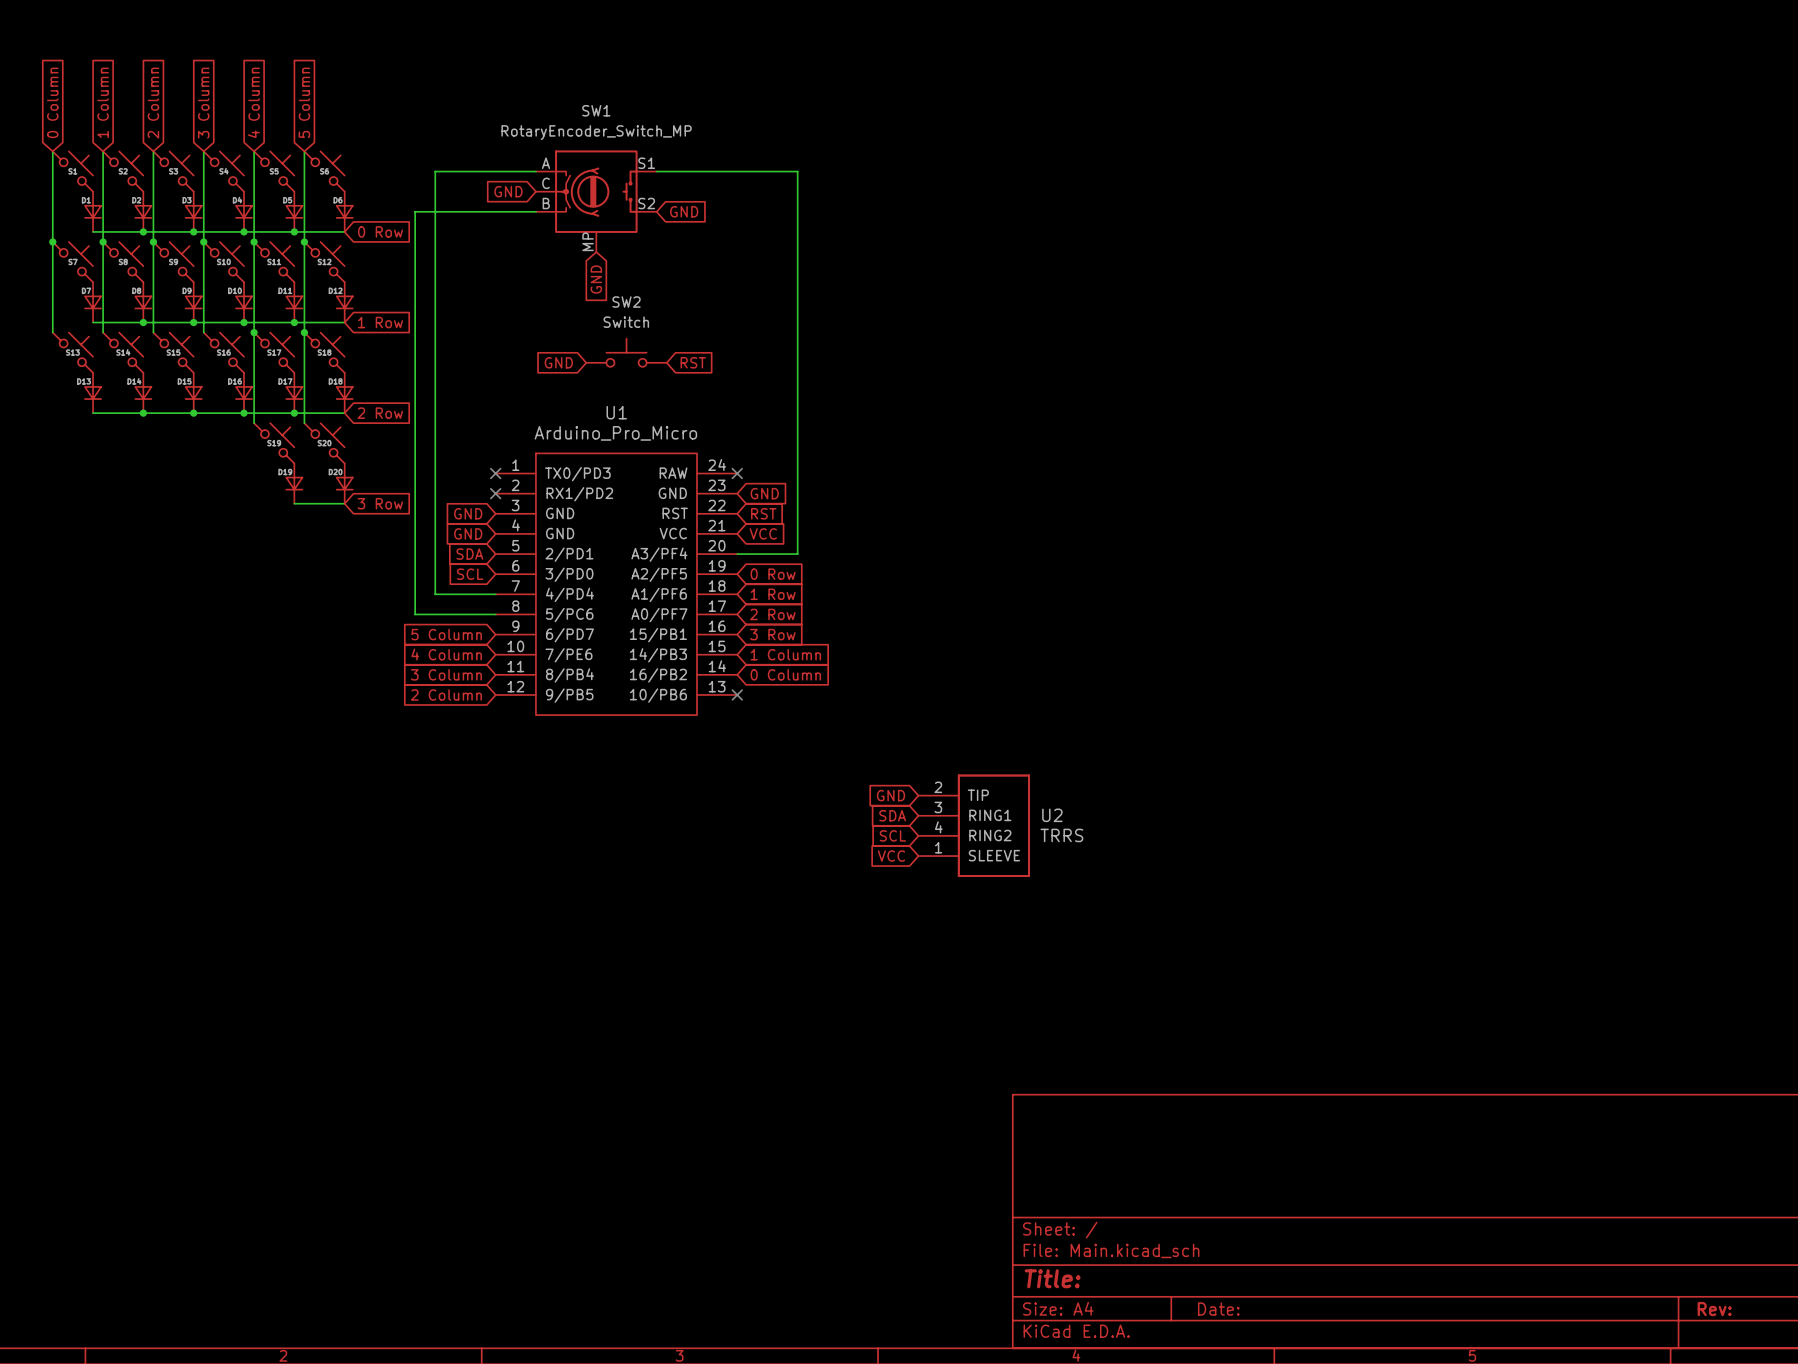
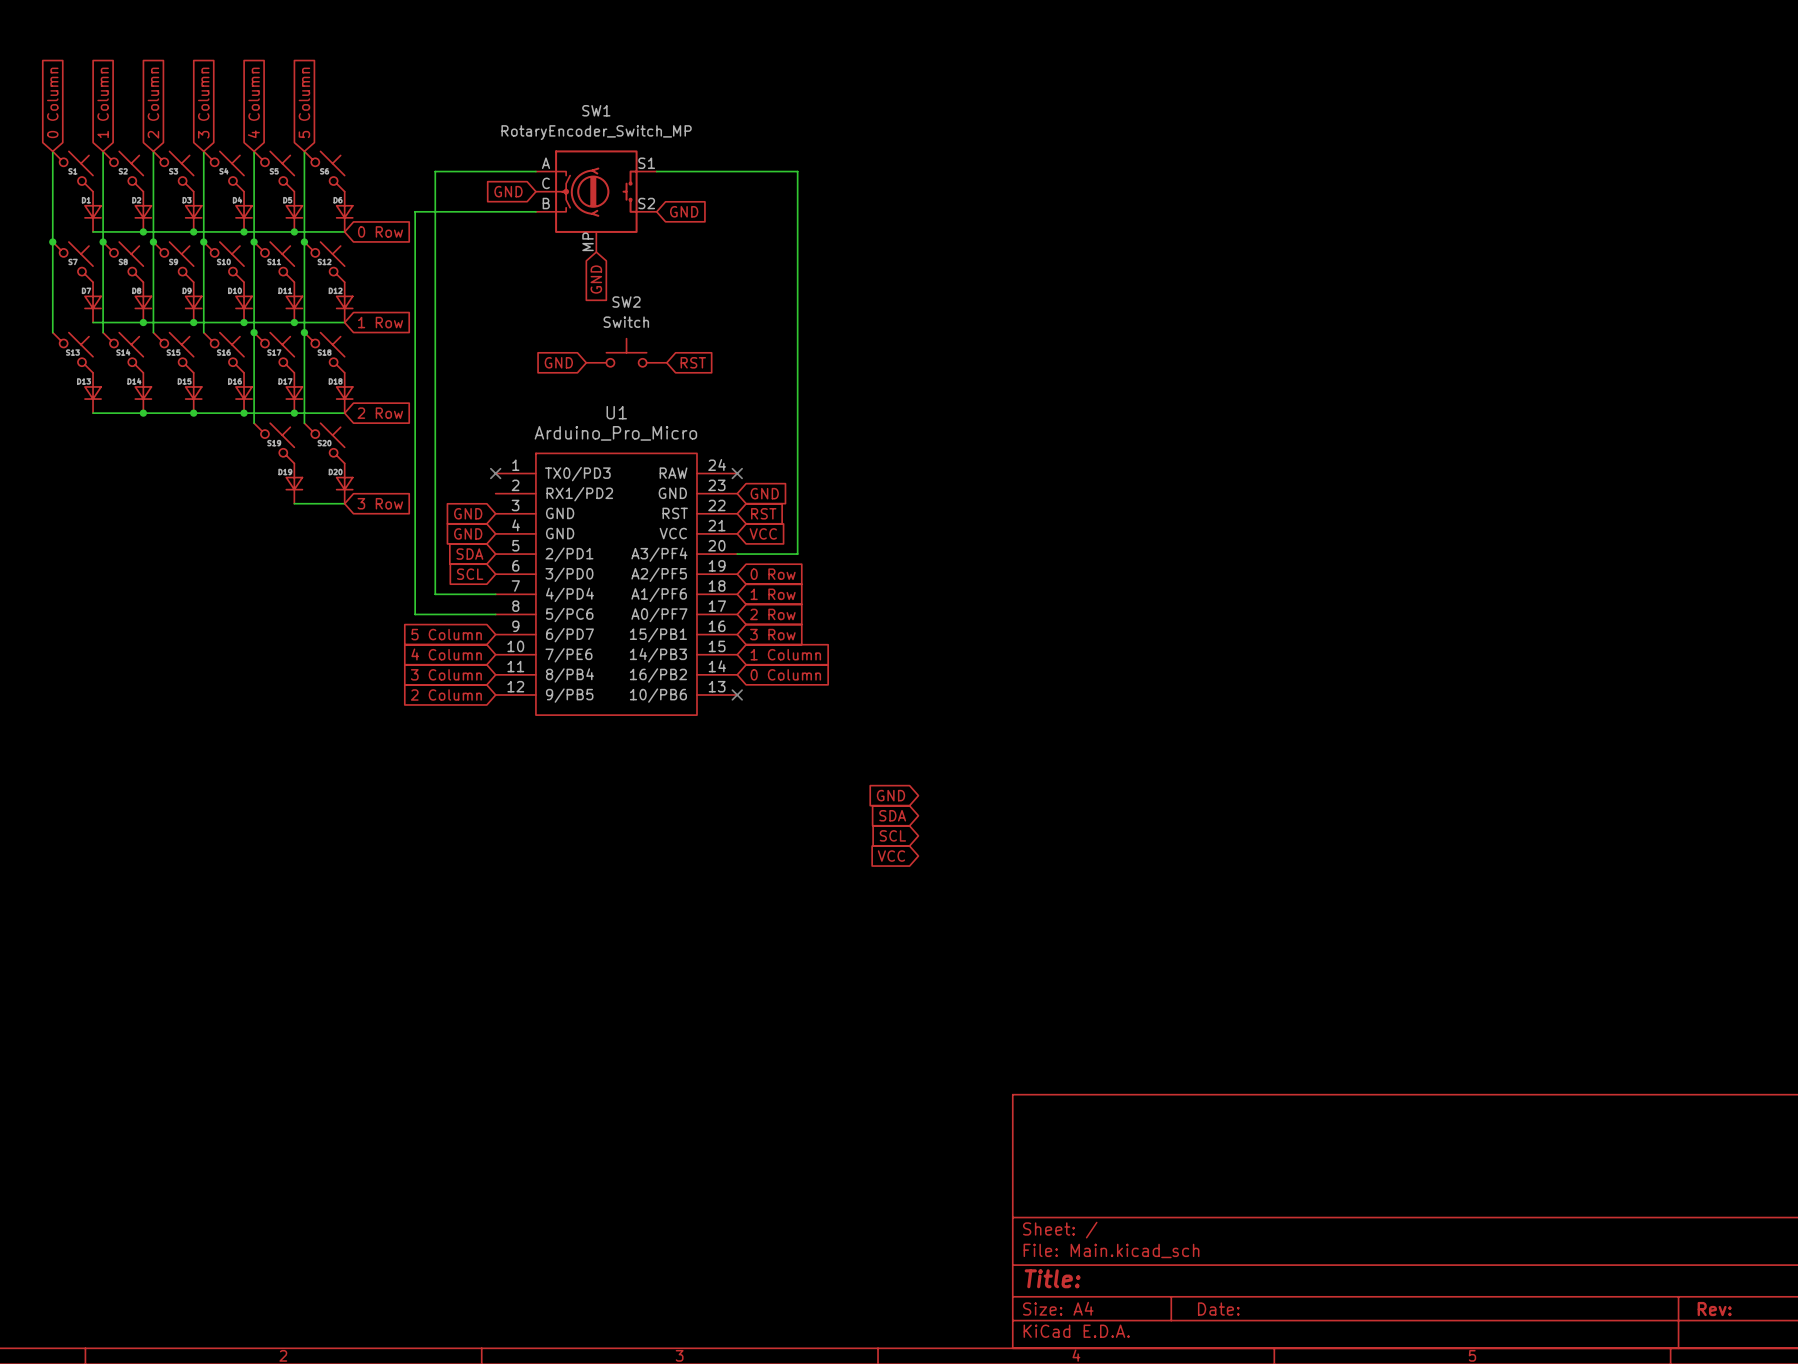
no-connect mark: (495, 493) -> none
U2: TRRS (973, 825) -> none

